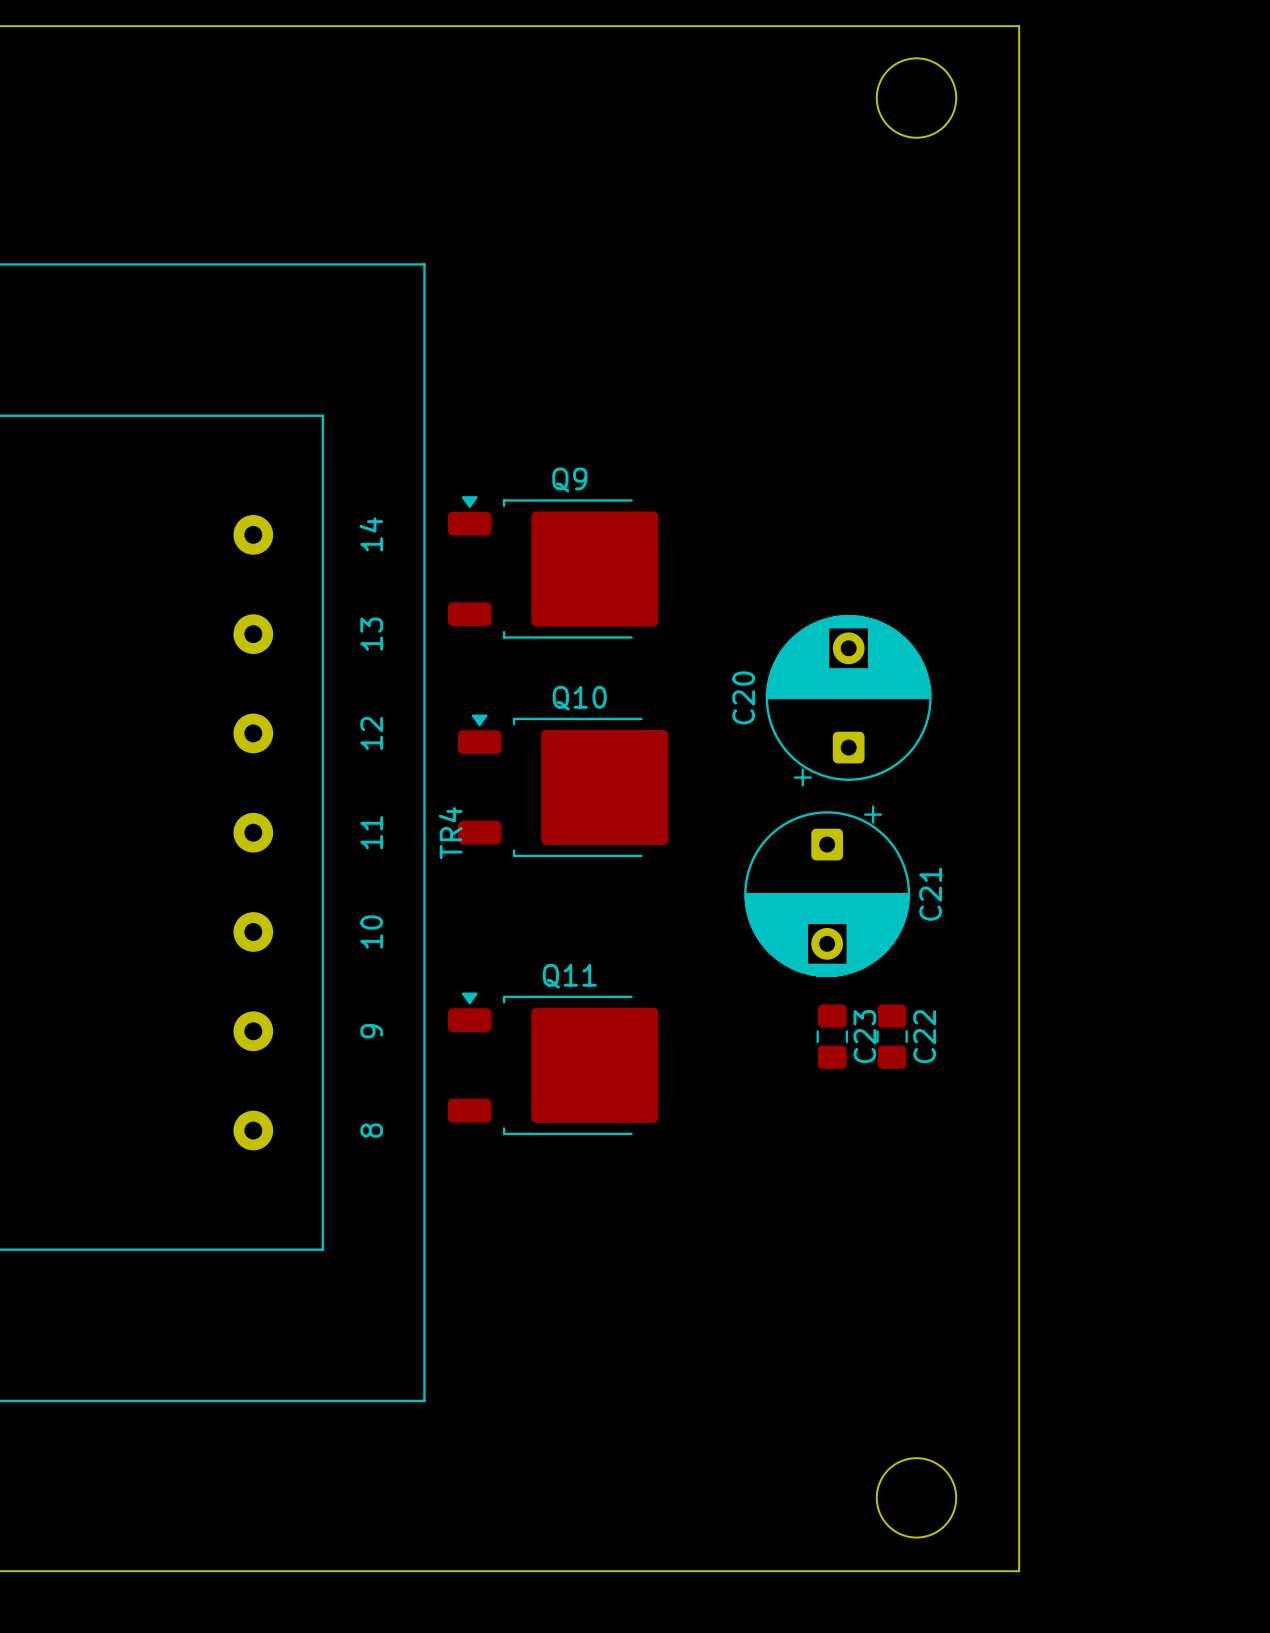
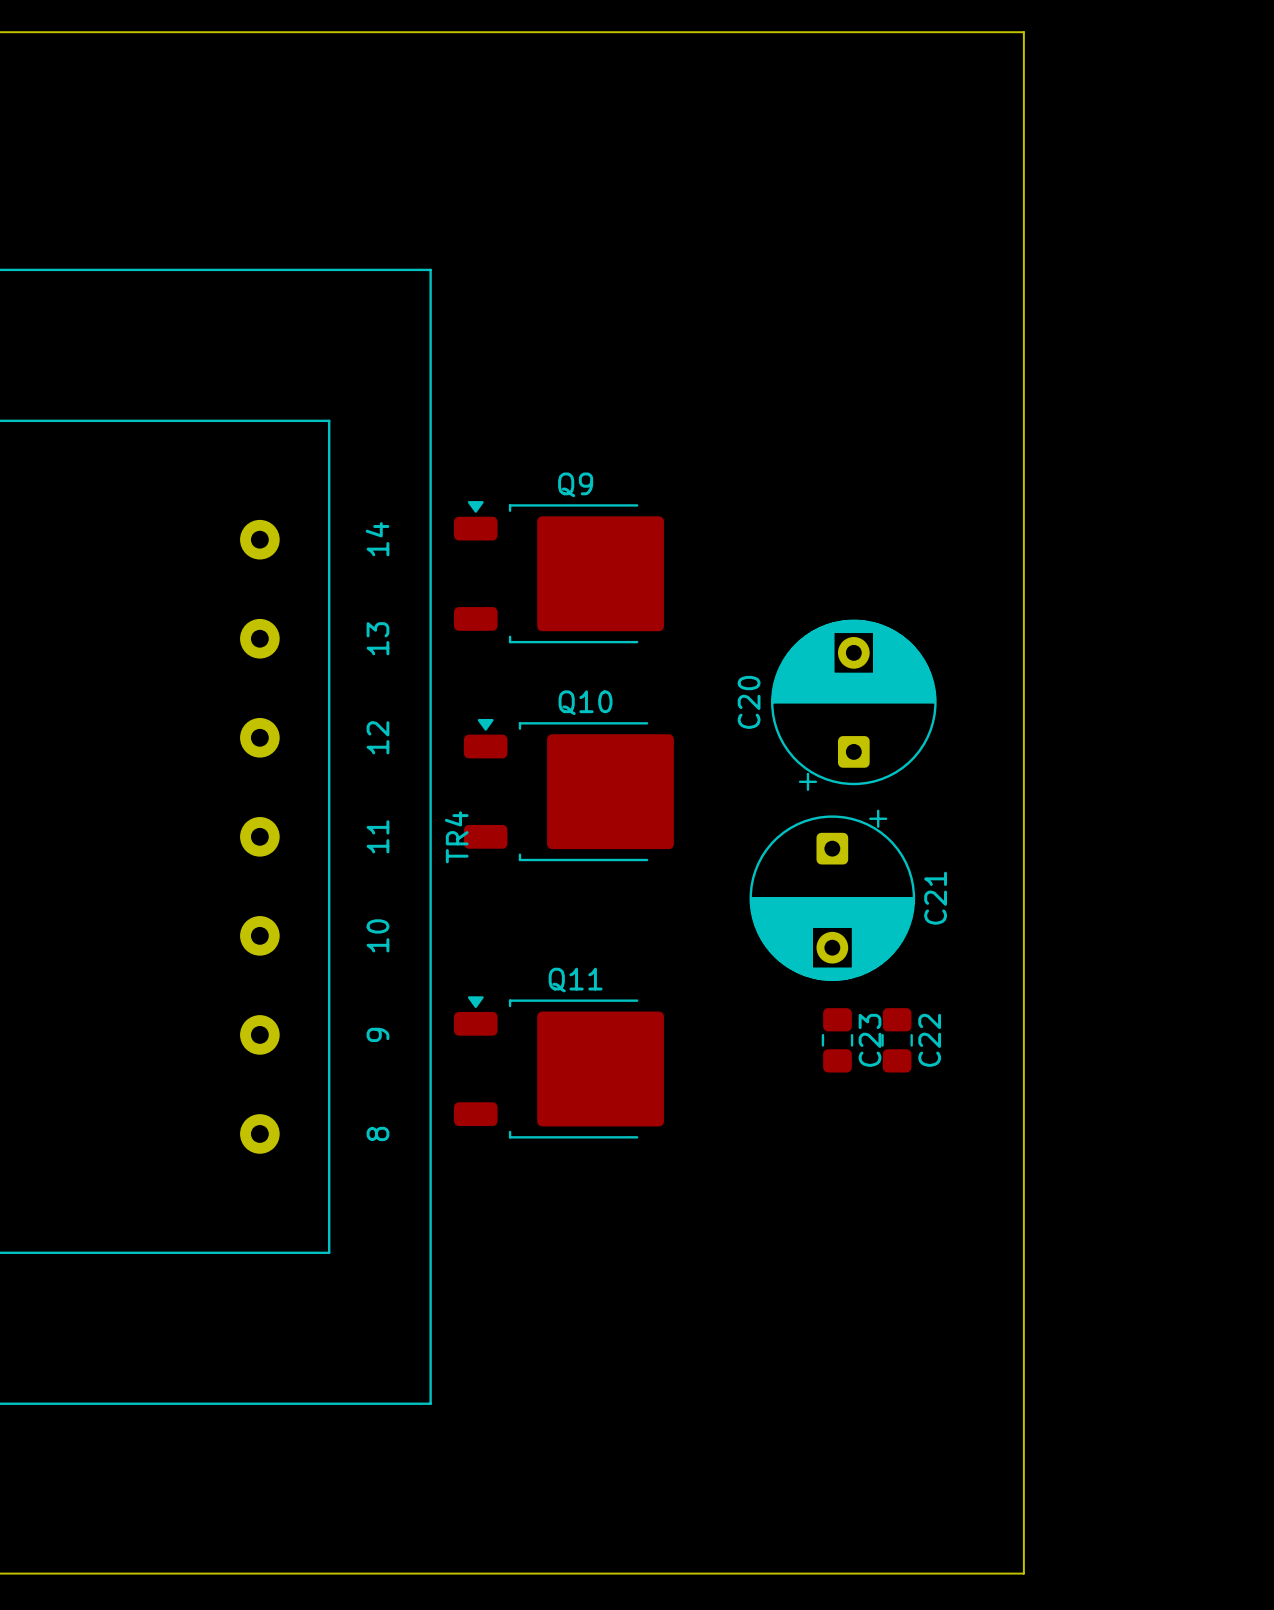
round board edge: [876, 57, 957, 139] -> none
round board edge: [876, 1457, 957, 1539] -> none

